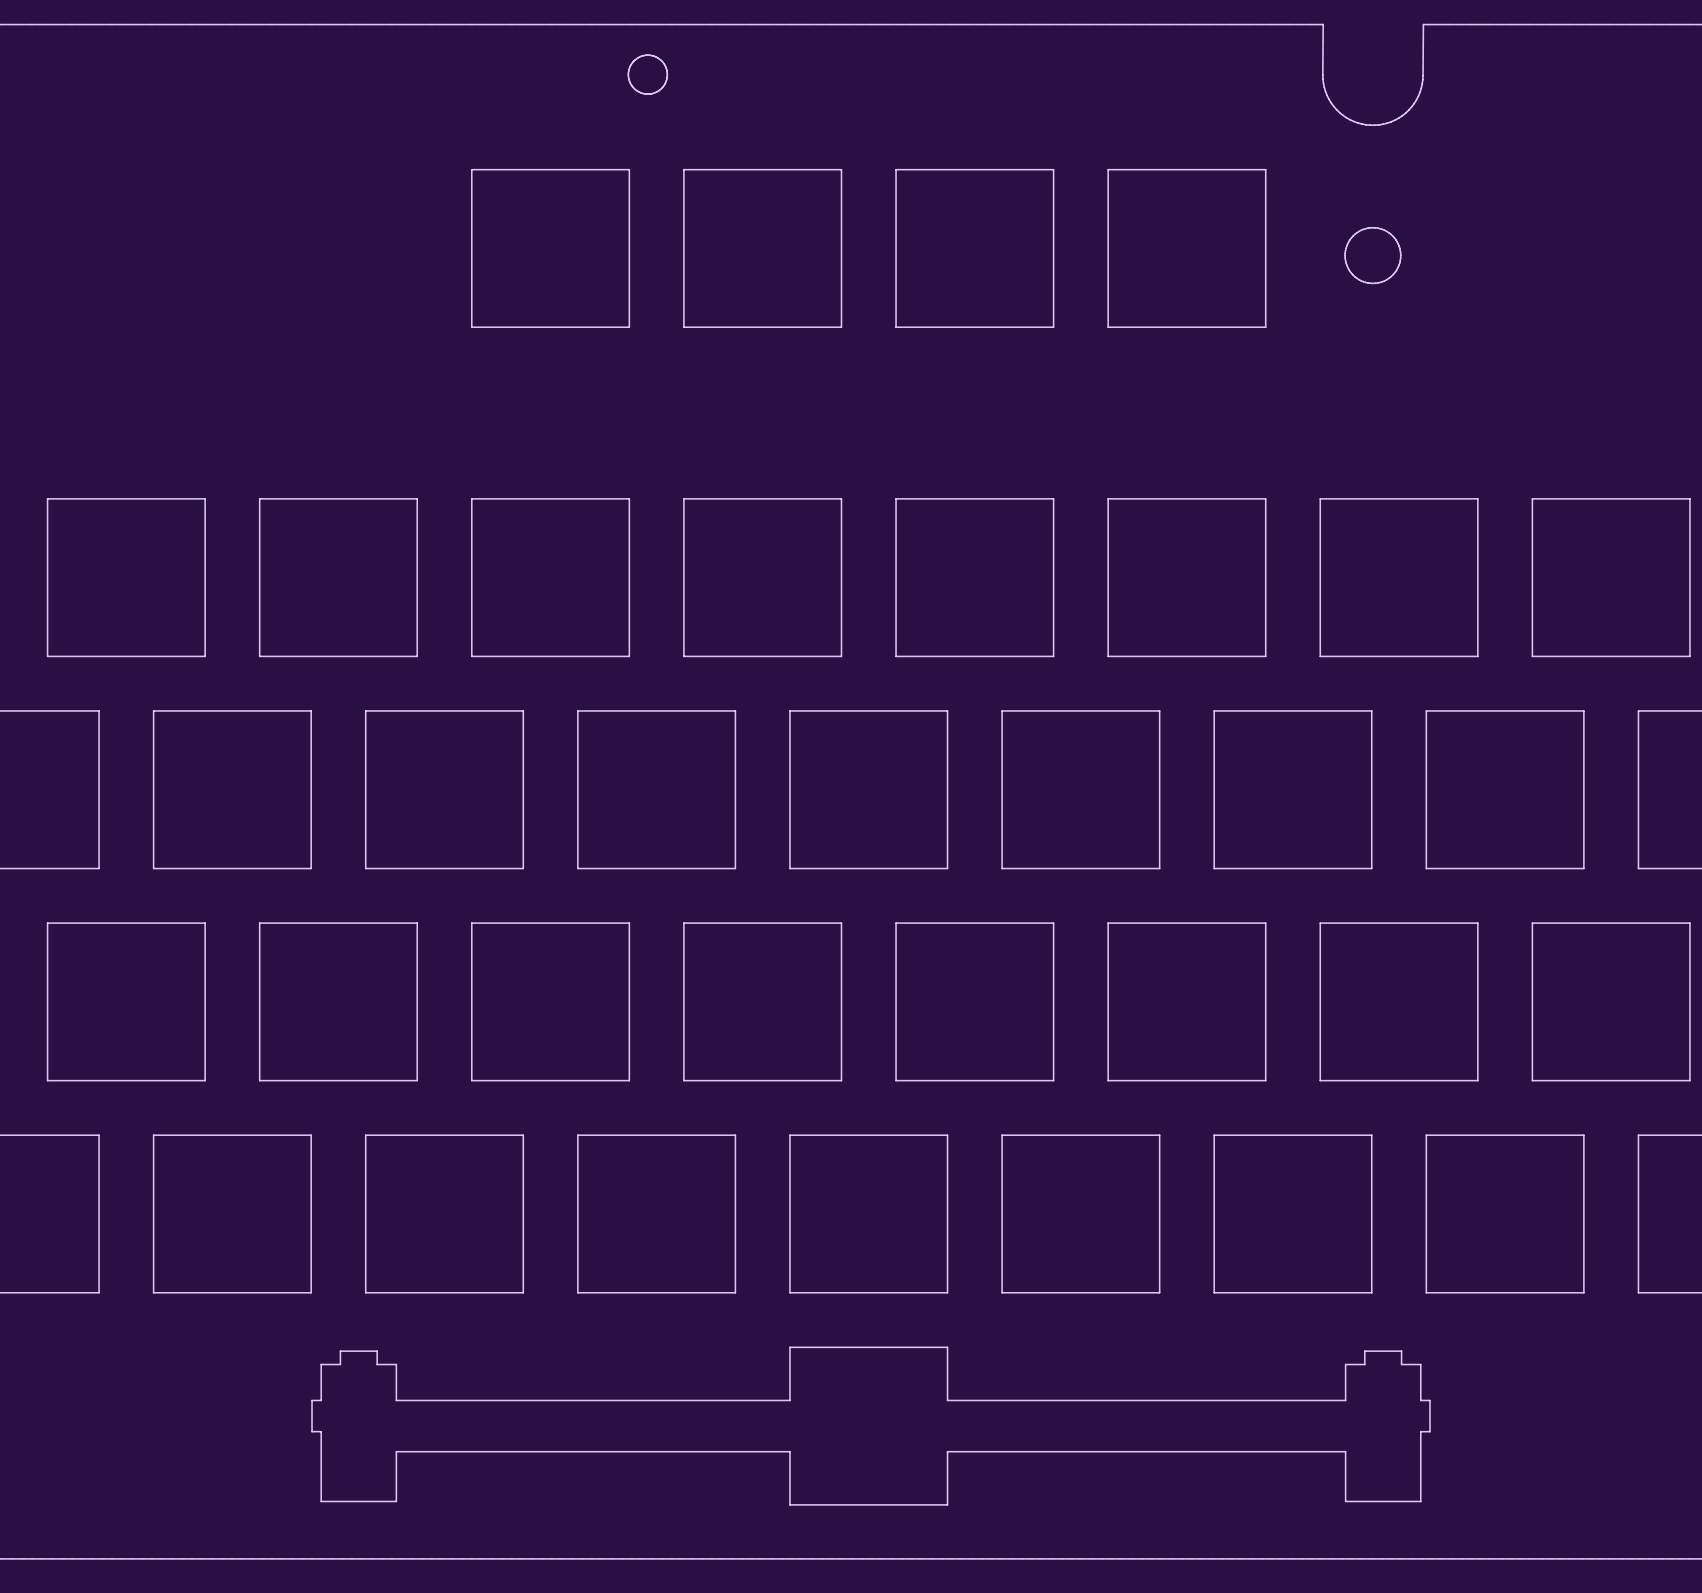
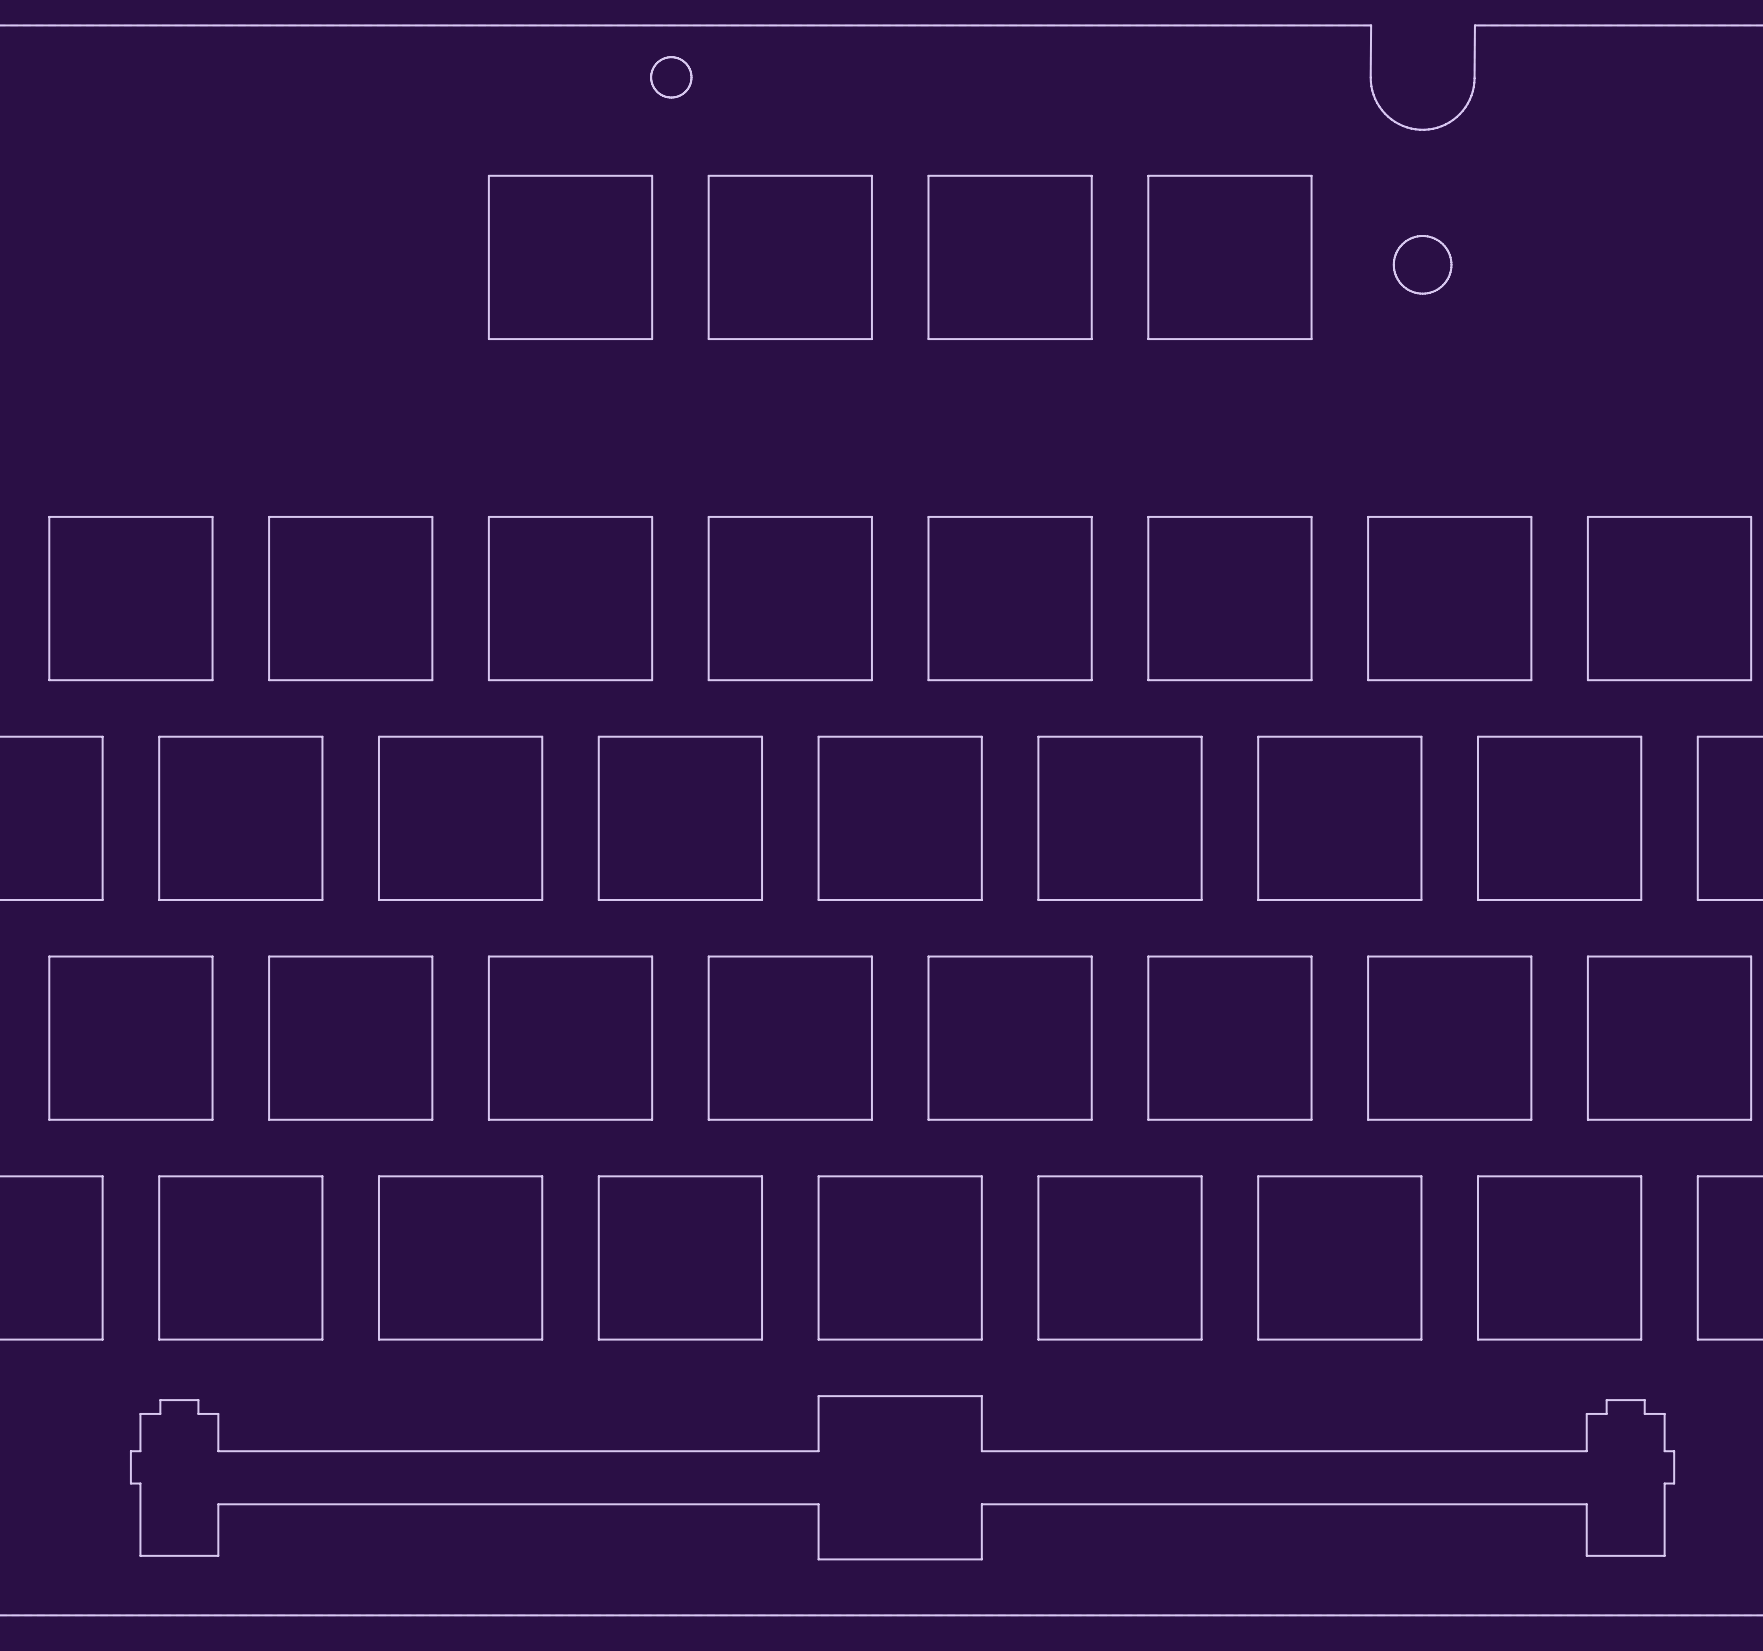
board edge: (312, 1400) (312, 1431) (321, 1431) (321, 1501) (396, 1501) (396, 1451) -> (323, 1451) (218, 1451) (218, 1413) (198, 1413) (198, 1400) (160, 1400) (160, 1413) (140, 1413) (140, 1451) (130, 1451) (130, 1483) (140, 1483) (140, 1555) (218, 1555) (218, 1504) (410, 1504)
board edge: (321, 1400) (321, 1364) (340, 1364) (340, 1351) (377, 1351) (377, 1364) (396, 1364) (396, 1400) -> (332, 1451) (410, 1451)
board edge: (1345, 1400) (1345, 1364) (1364, 1364) (1364, 1351) (1401, 1351) (1401, 1364) (1420, 1364) (1420, 1400) -> (1394, 1451) (1472, 1451)
board edge: (1429, 1400) (1429, 1431) (1420, 1431) (1420, 1501) (1345, 1501) (1345, 1451) -> (1481, 1451) (1586, 1451) (1586, 1413) (1606, 1413) (1606, 1400) (1644, 1400) (1644, 1413) (1664, 1413) (1664, 1451) (1674, 1451) (1674, 1483) (1664, 1483) (1664, 1555) (1586, 1555) (1586, 1504) (1394, 1504)

